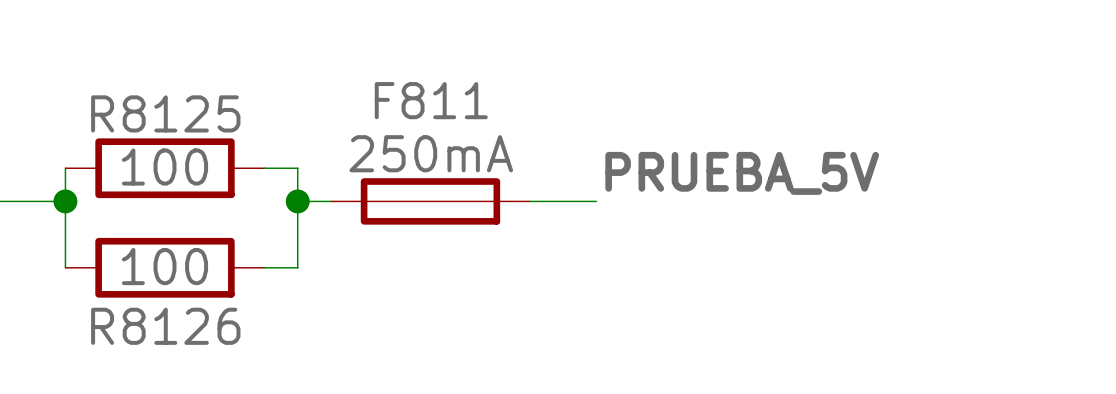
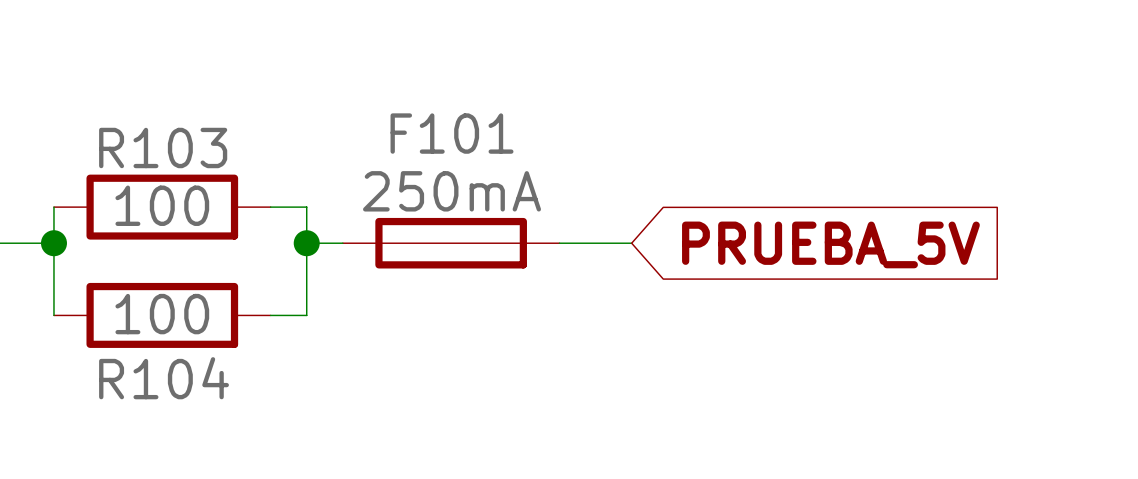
F811 name: F811 (431, 100) -> F101 (452, 133)
R8125 name: R8125 (165, 113) -> R103 (163, 147)
label: PRUEBA_5V (742, 173) -> none
global label: none -> PRUEBA_5V (830, 244)
R8126 name: R8126 (165, 326) -> R104 (164, 378)

